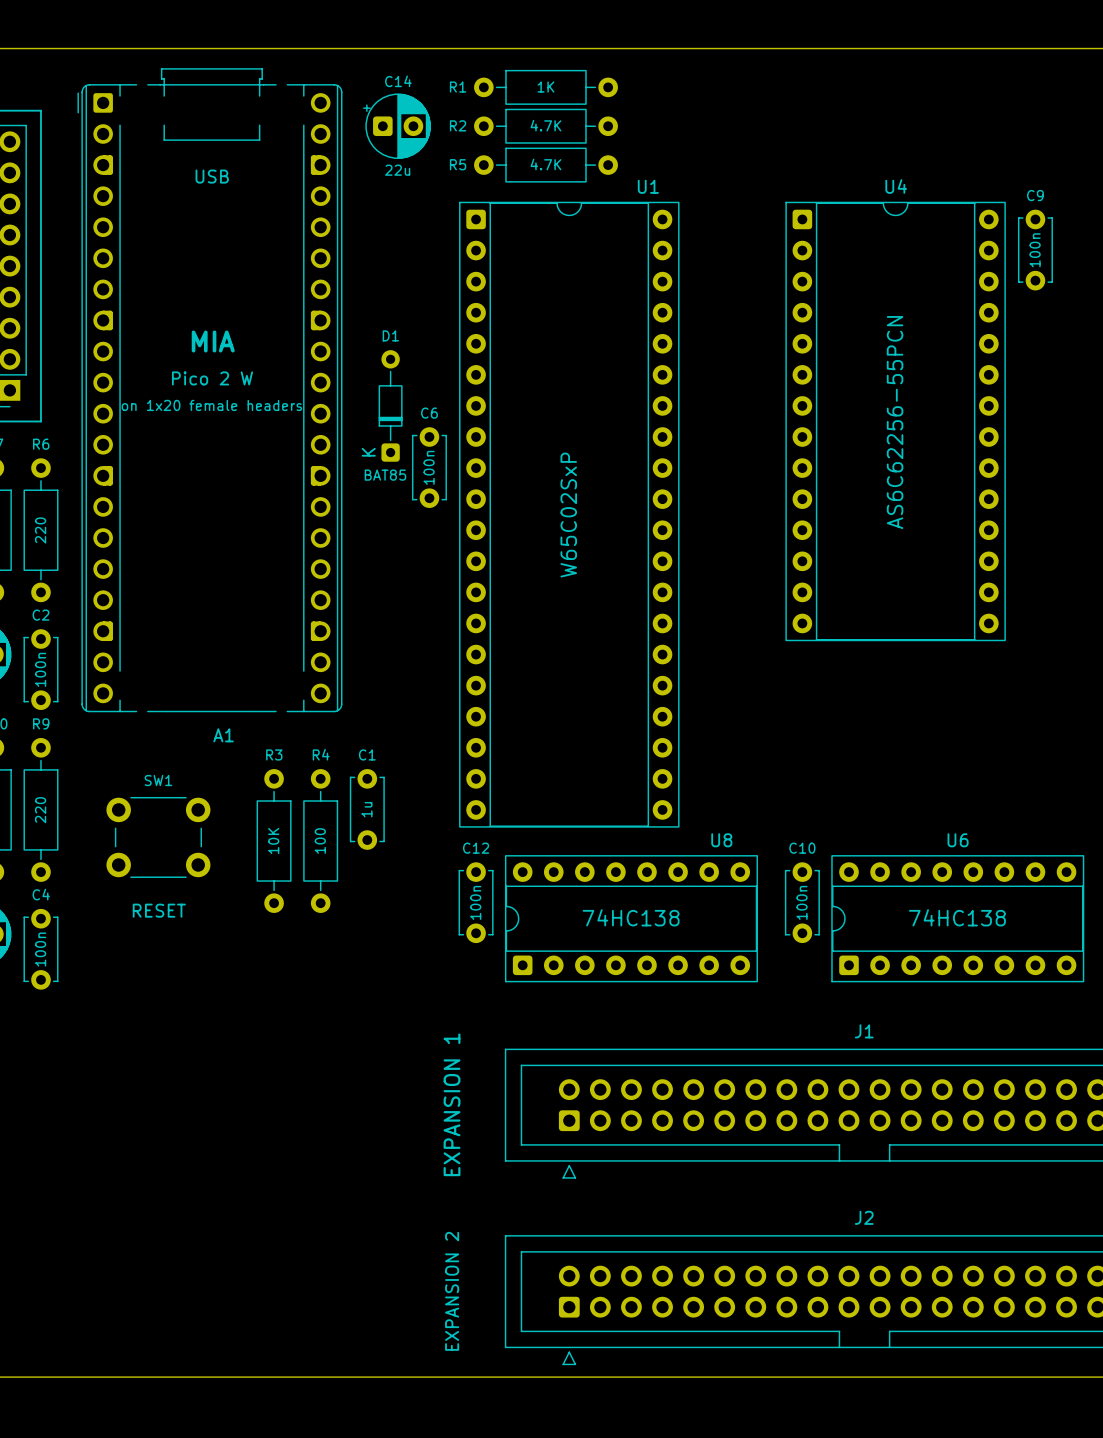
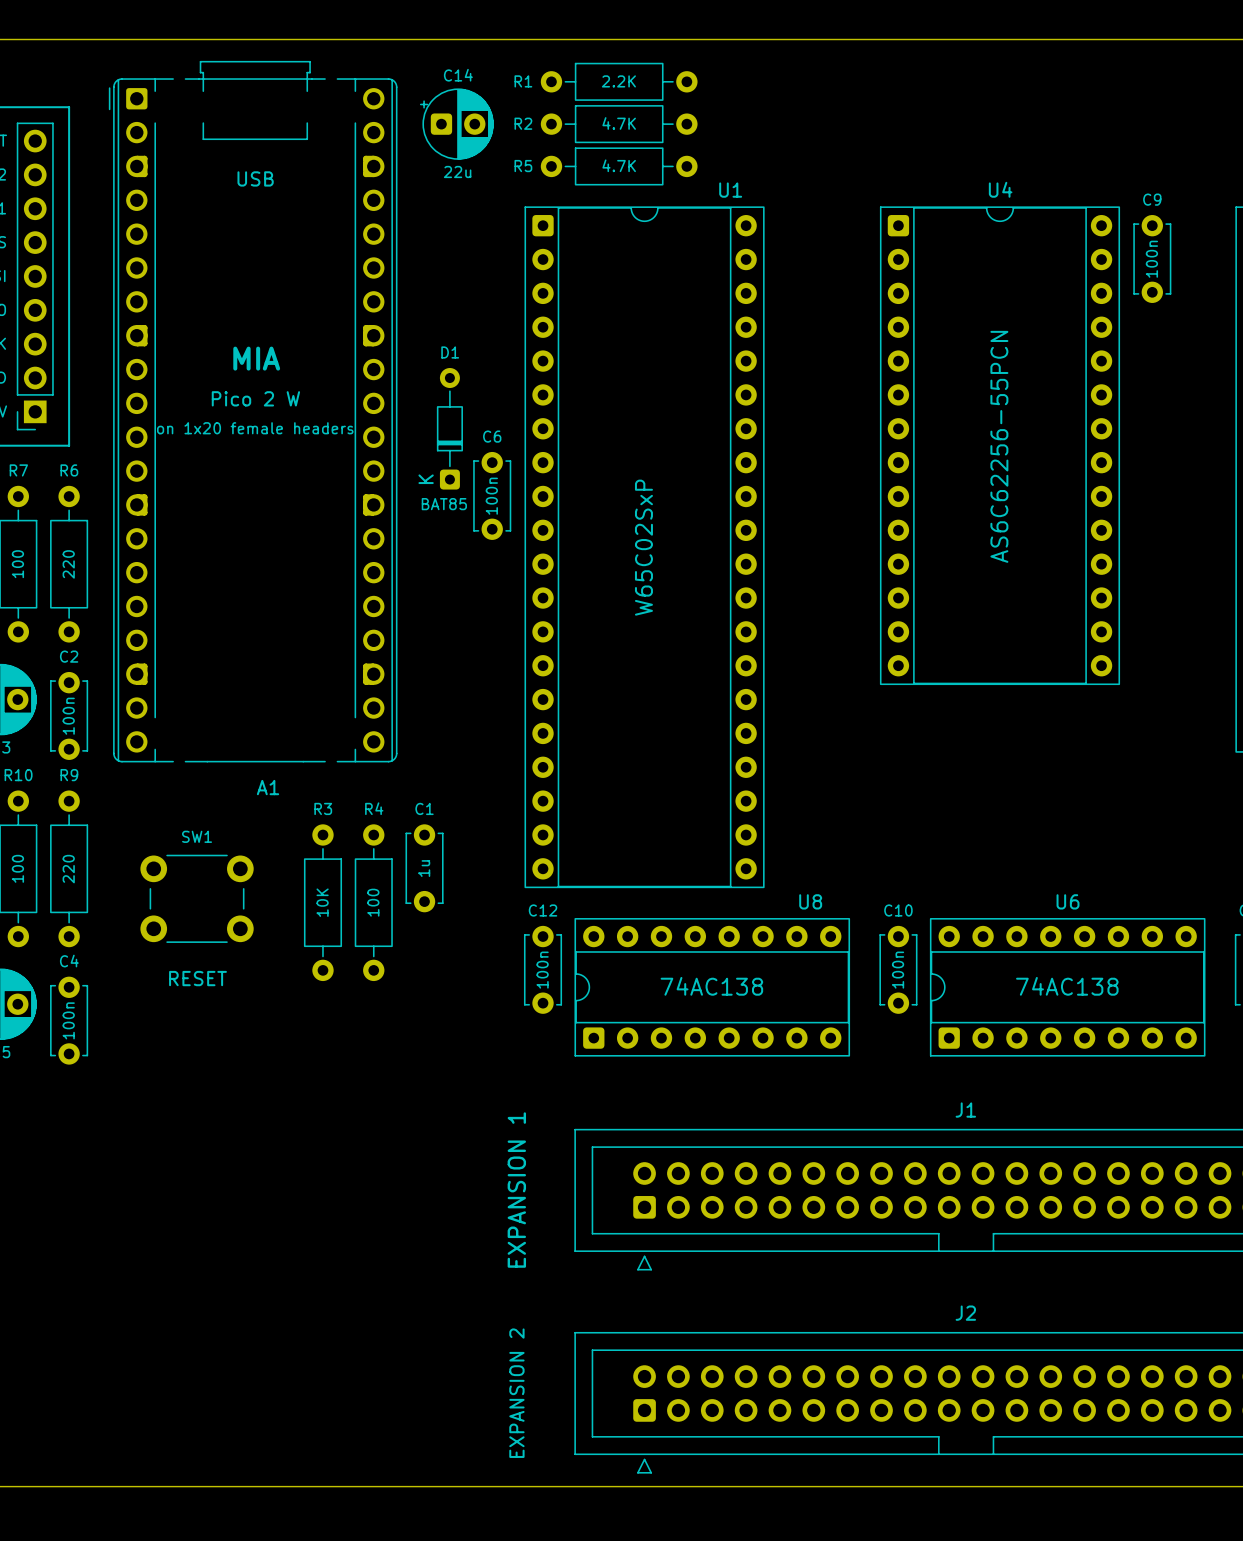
R1 value: 1K (545, 87) -> 2.2K (618, 81)
U8 value: 74HC138 (631, 917) -> 74AC138 (711, 986)
U6 value: 74HC138 (957, 917) -> 74AC138 (1067, 986)

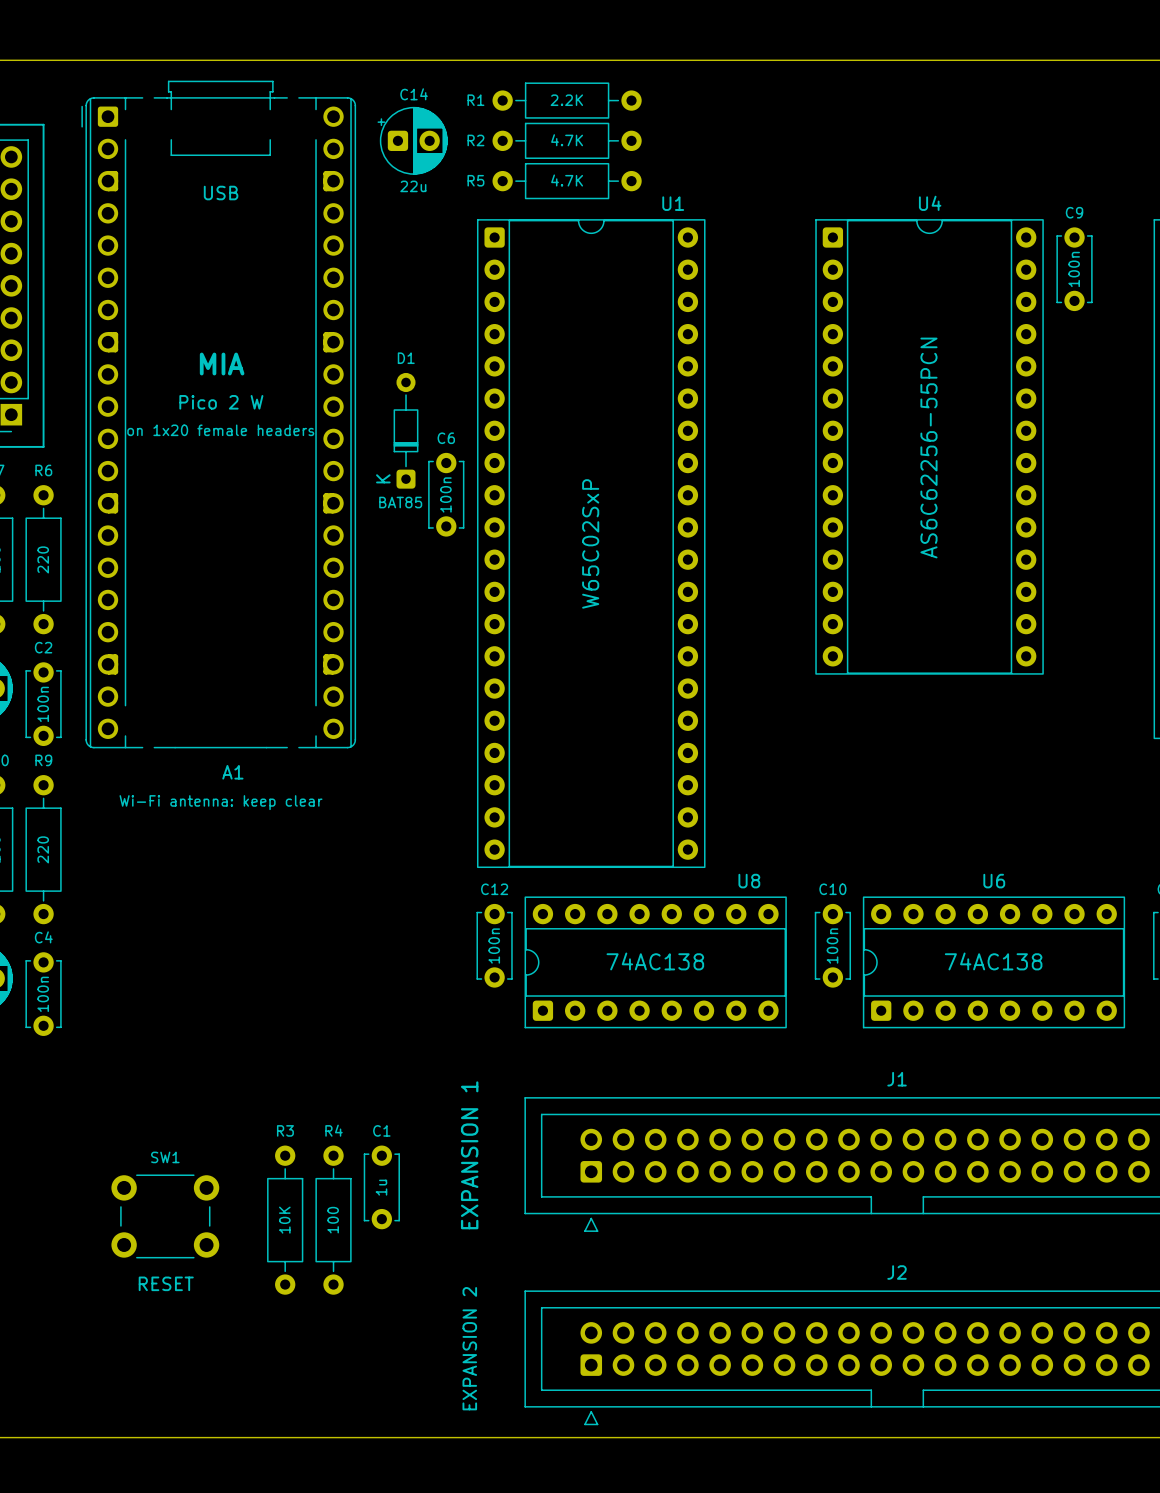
text: none -> Wi-Fi antenna: keep clear (221, 802)
C1 position: (424, 868) -> (381, 1187)
SW1 position: (197, 898) -> (165, 1216)
R3 position: (322, 902) -> (285, 1220)
R4 position: (373, 902) -> (333, 1220)
text: RESET (197, 978) -> none
text: none -> RESET (166, 1283)

